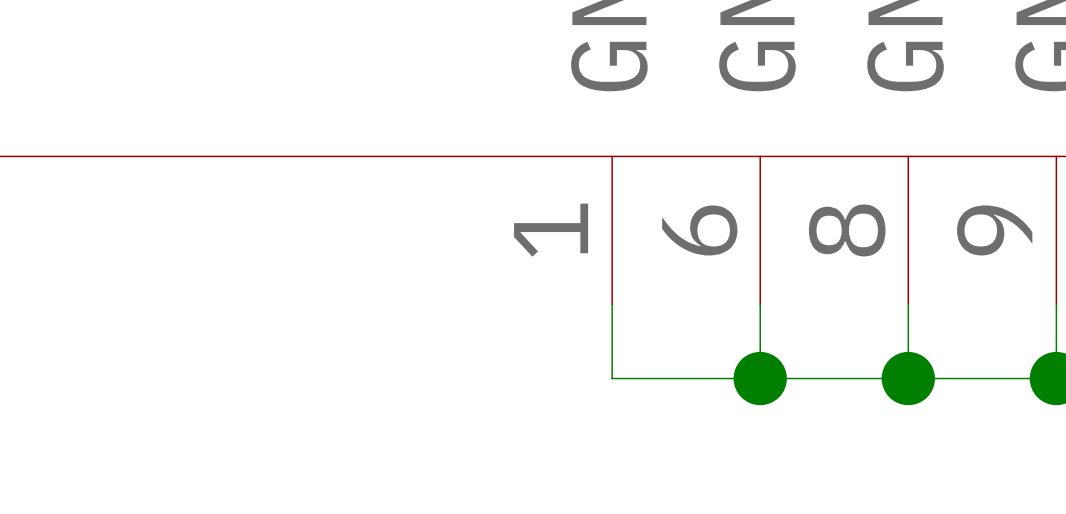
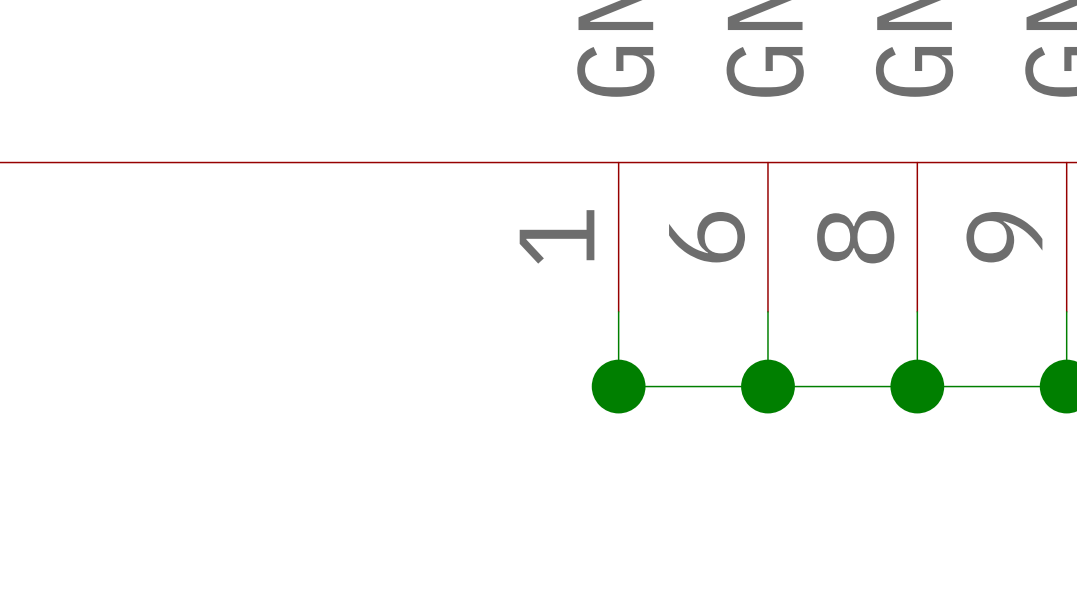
junction: none -> (618, 386)

